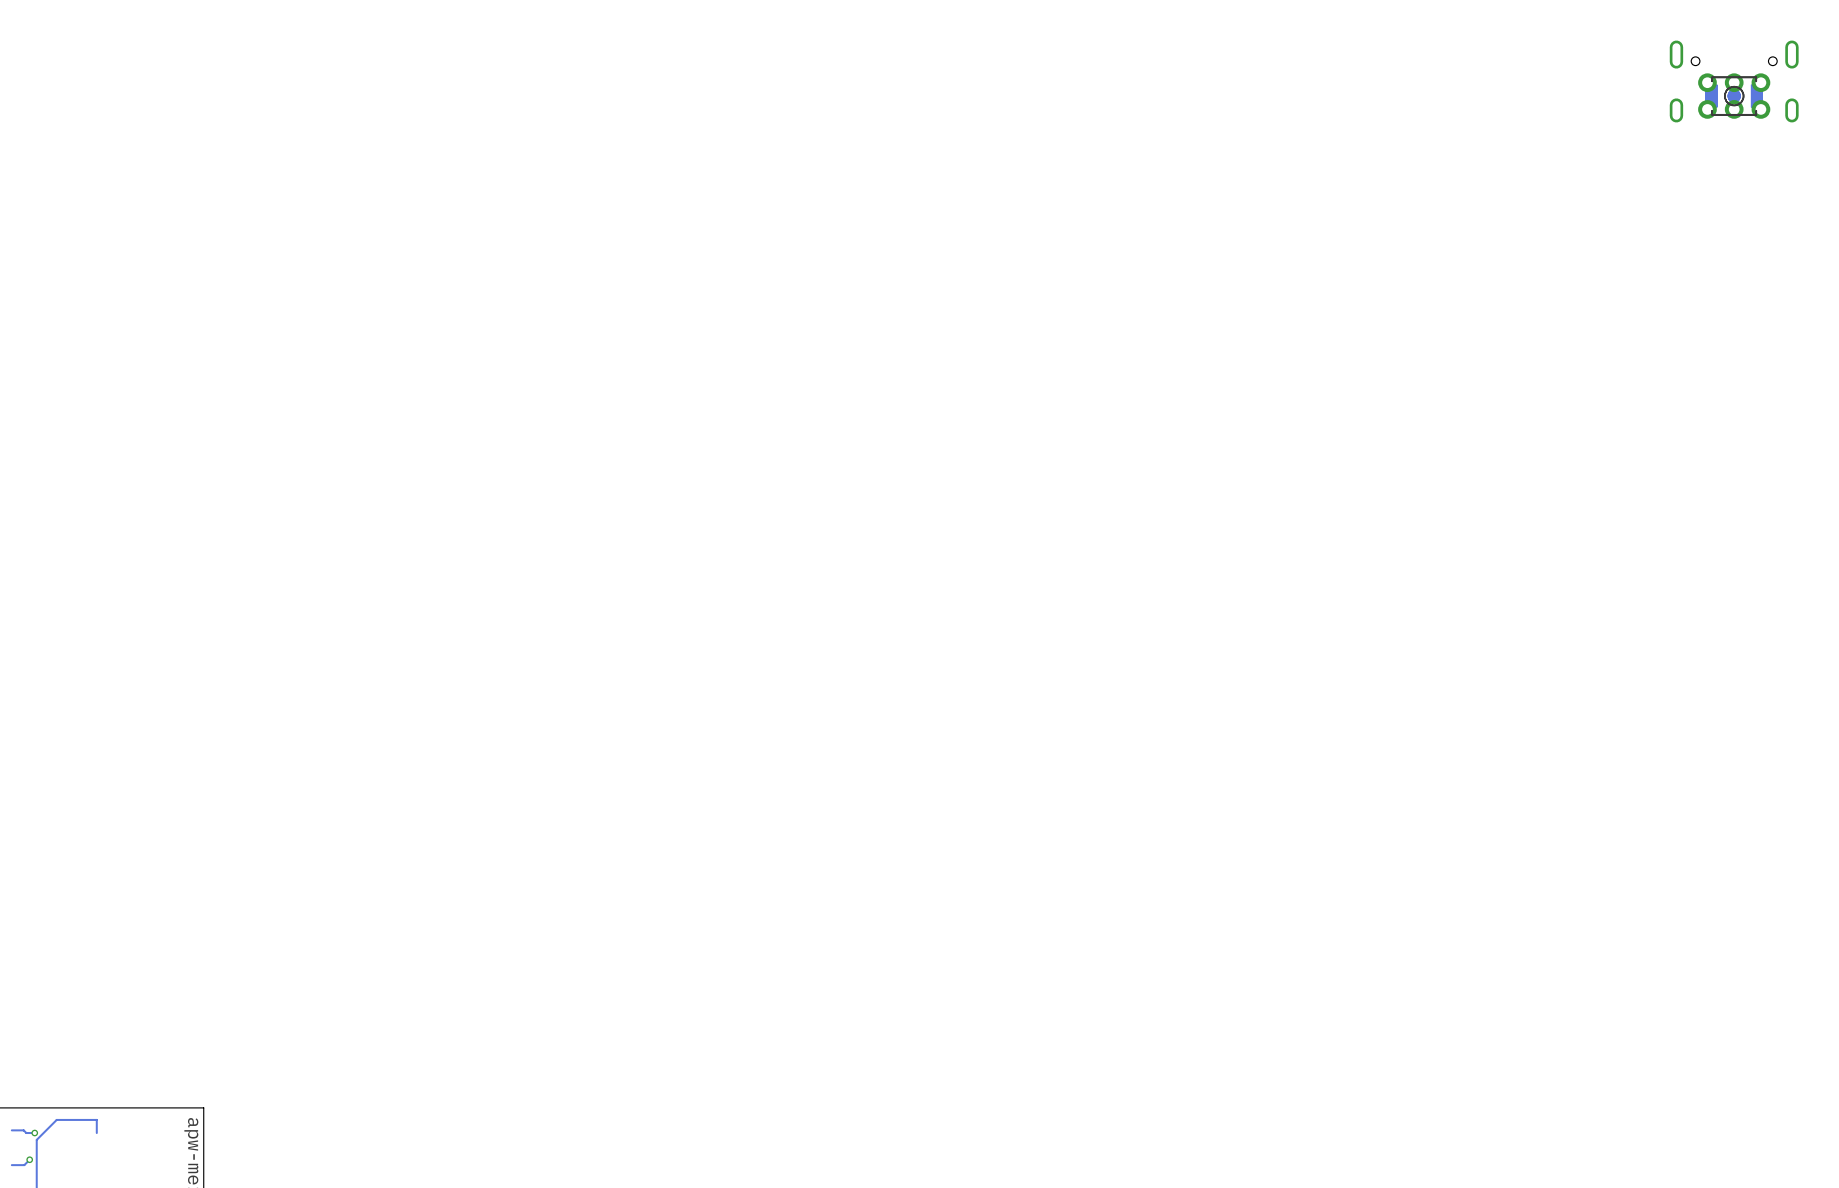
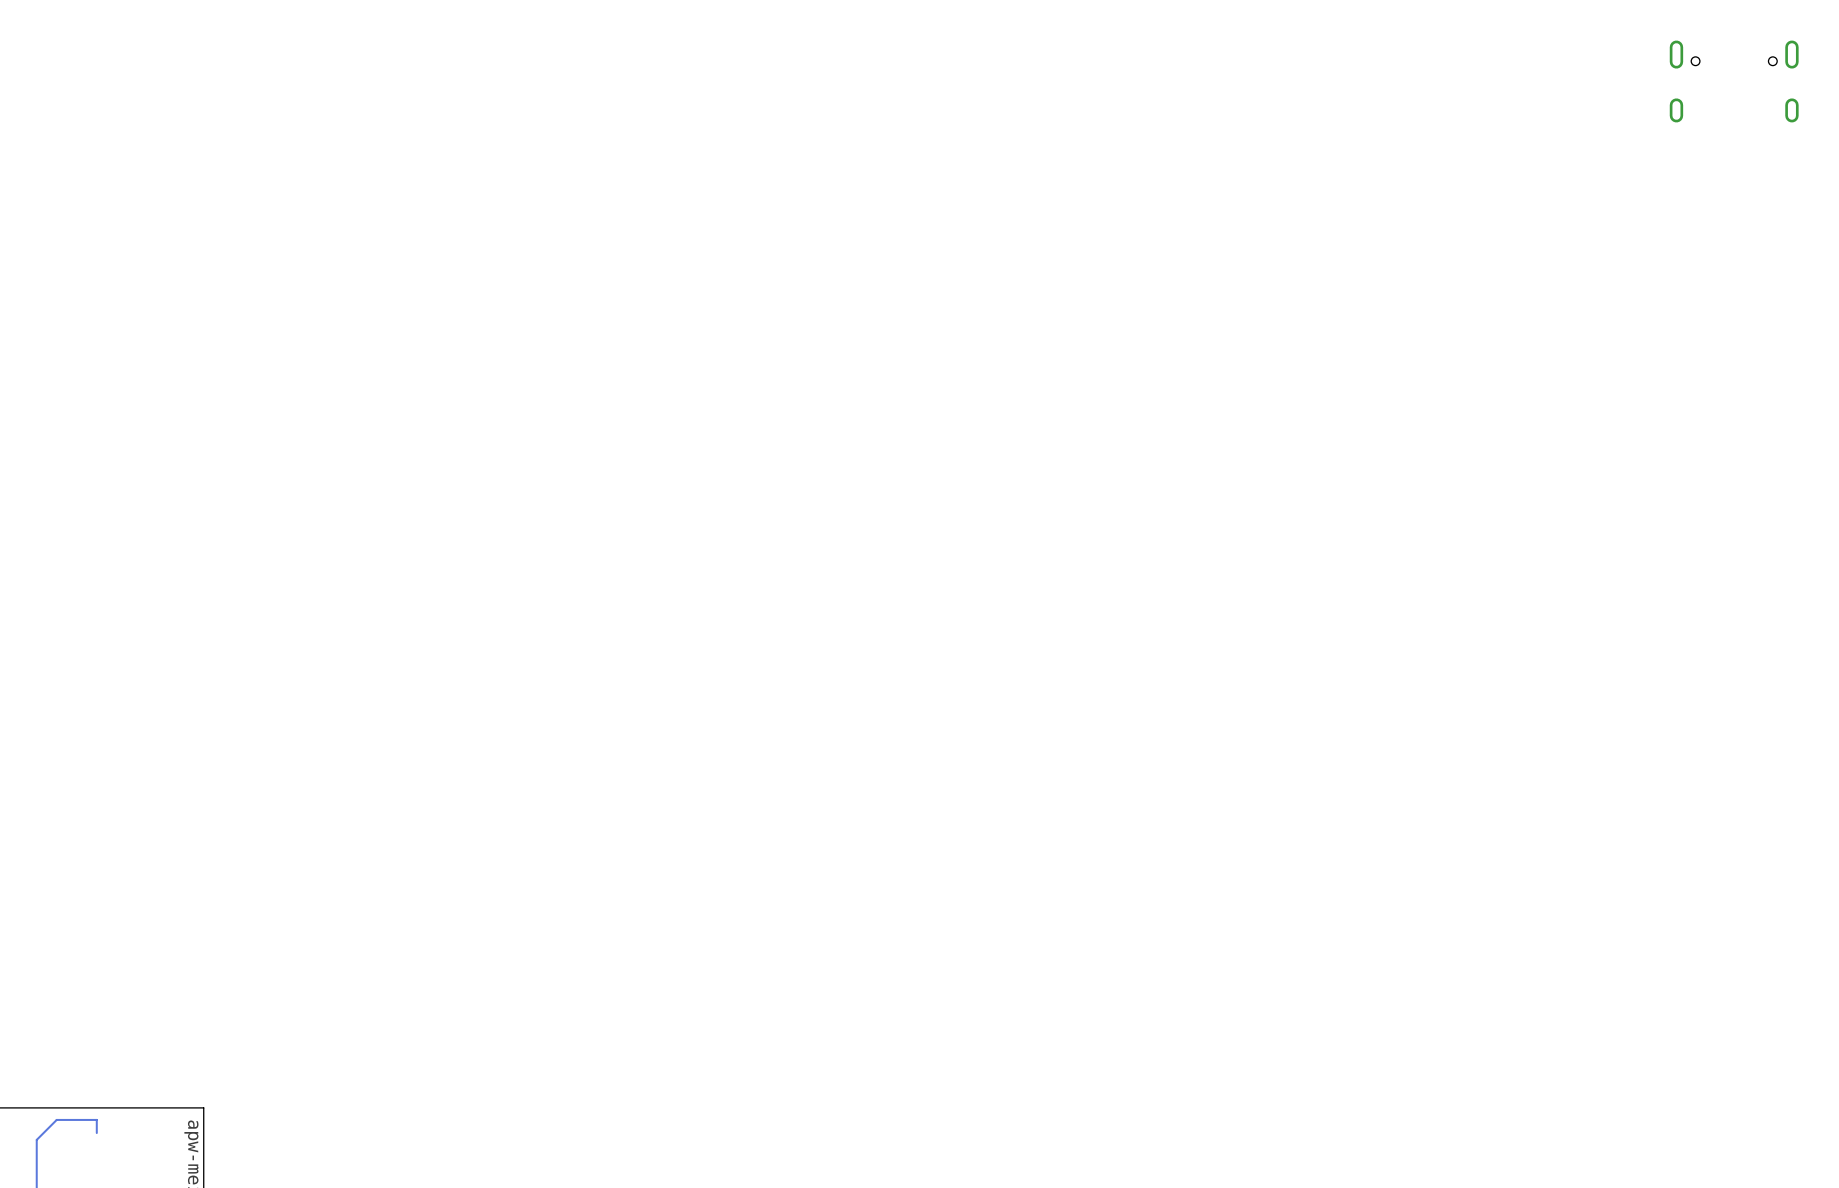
part: (1734, 96) -> none
part: (1734, 96) -> none
part: (1734, 96) -> none
track: (11, 1130) (34, 1133) -> none
via: (34, 1133) -> none
track: (29, 1159) (24, 1165) (11, 1165) -> none
via: (29, 1159) -> none

